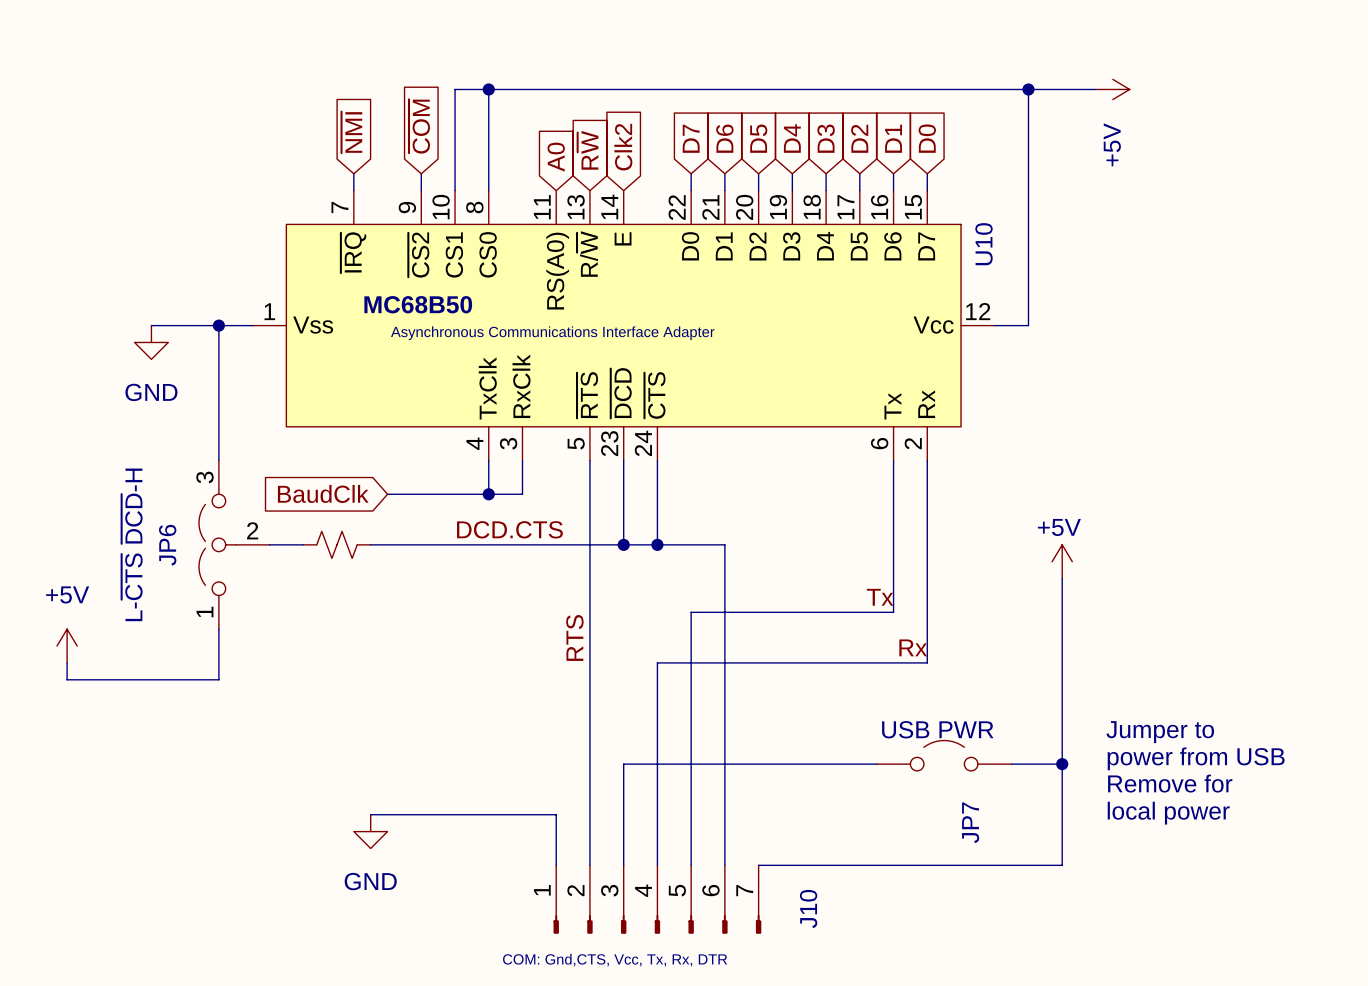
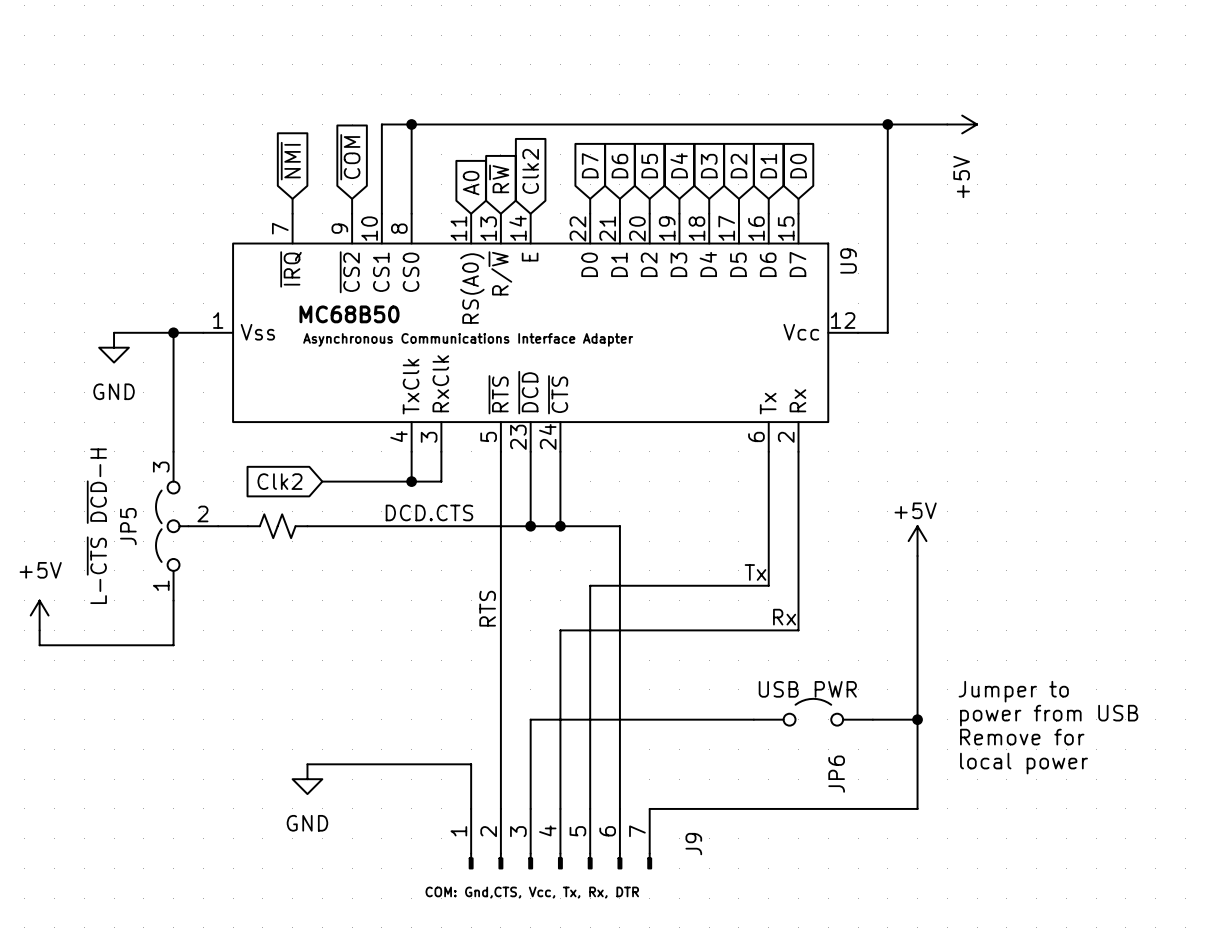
U10 name: U10 (984, 244) -> U9 (848, 261)
global label: BaudClk (323, 493) -> Clk2 (279, 481)
JP6 name: JP6 (167, 545) -> JP5 (128, 526)
JP7 name: JP7 (970, 822) -> JP6 (836, 774)
J10 name: J10 (808, 908) -> J9 (693, 844)

